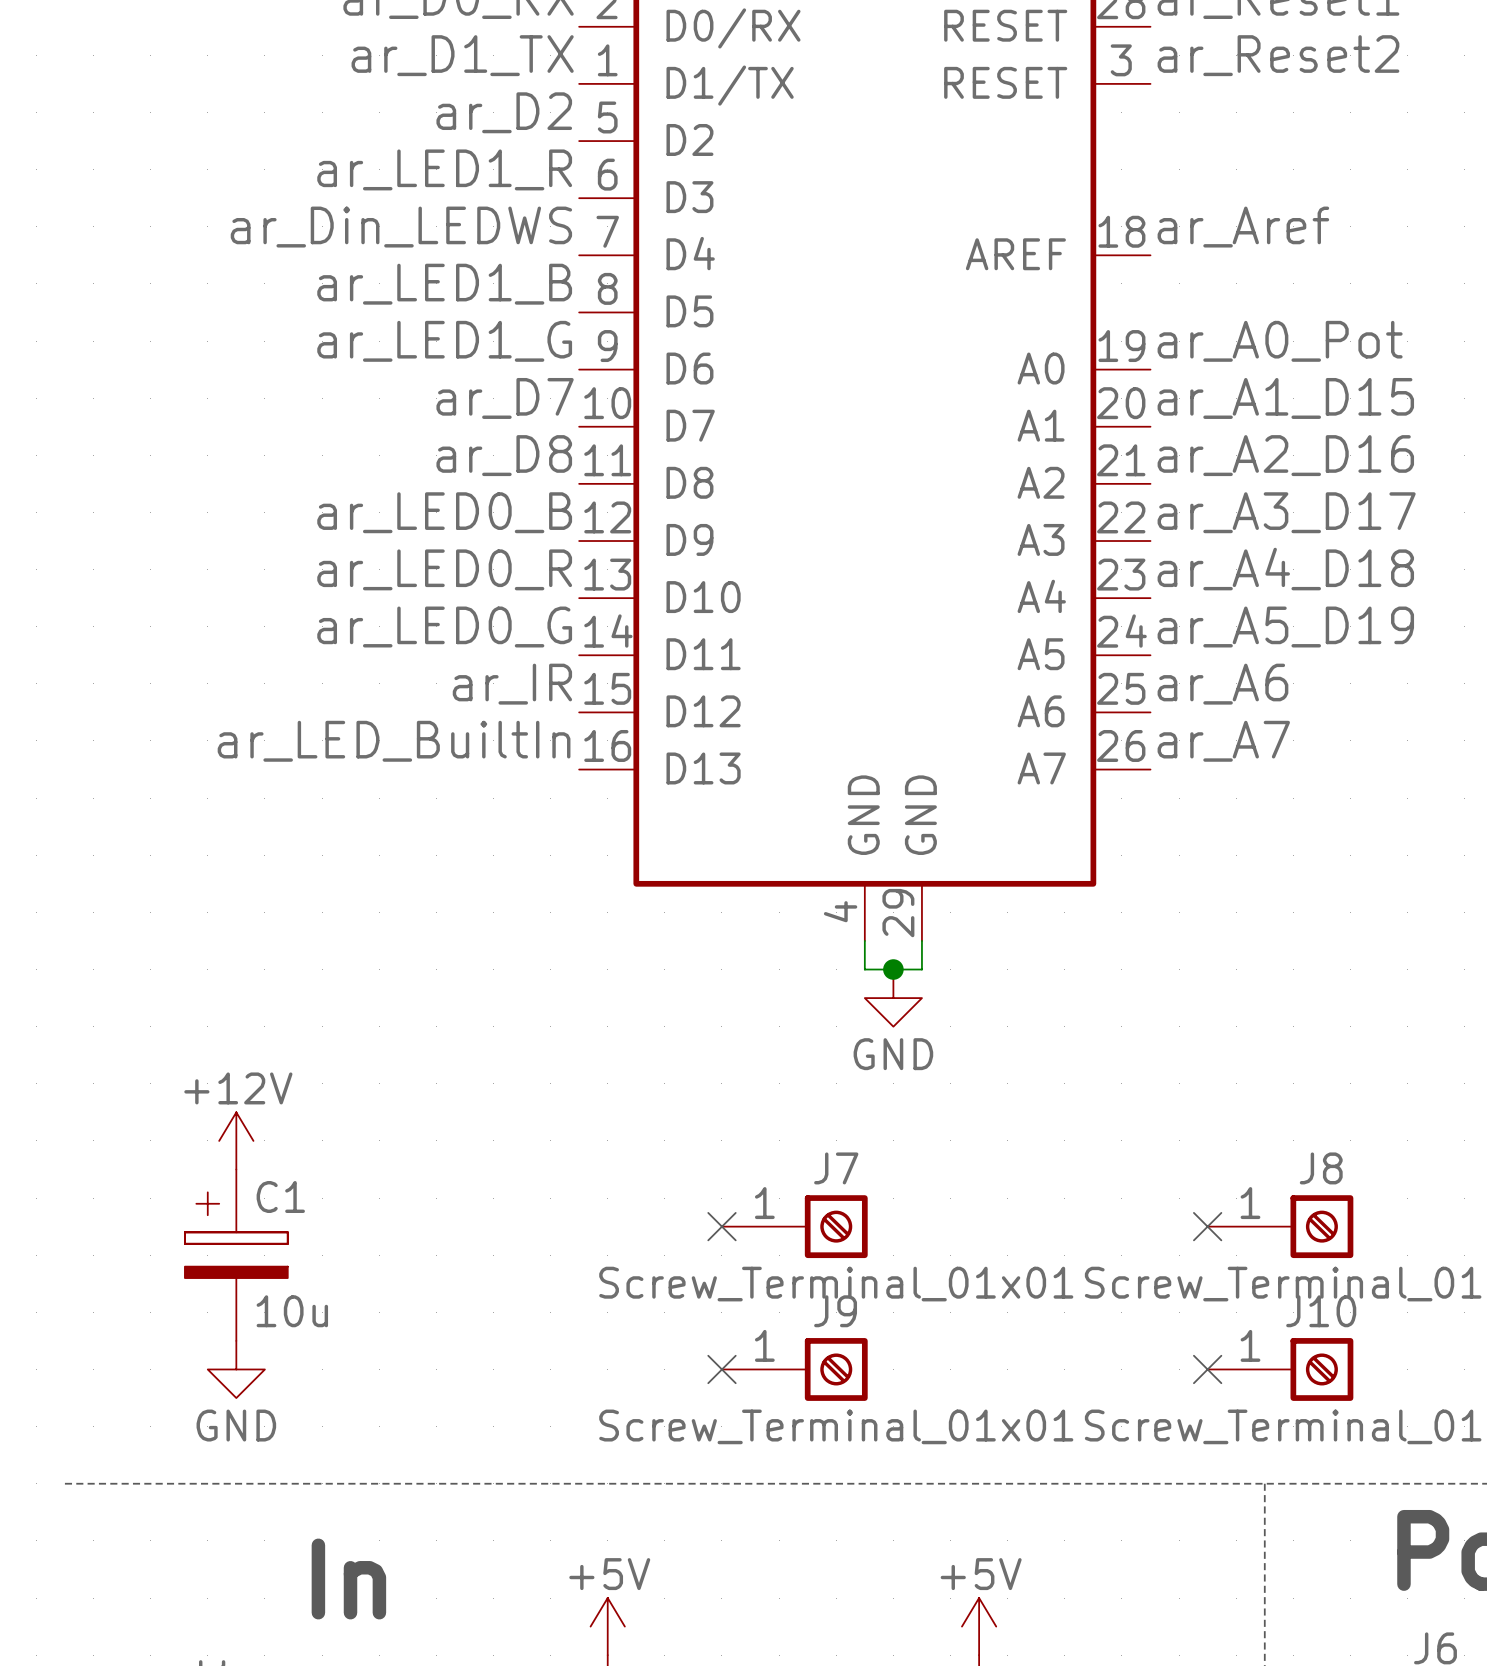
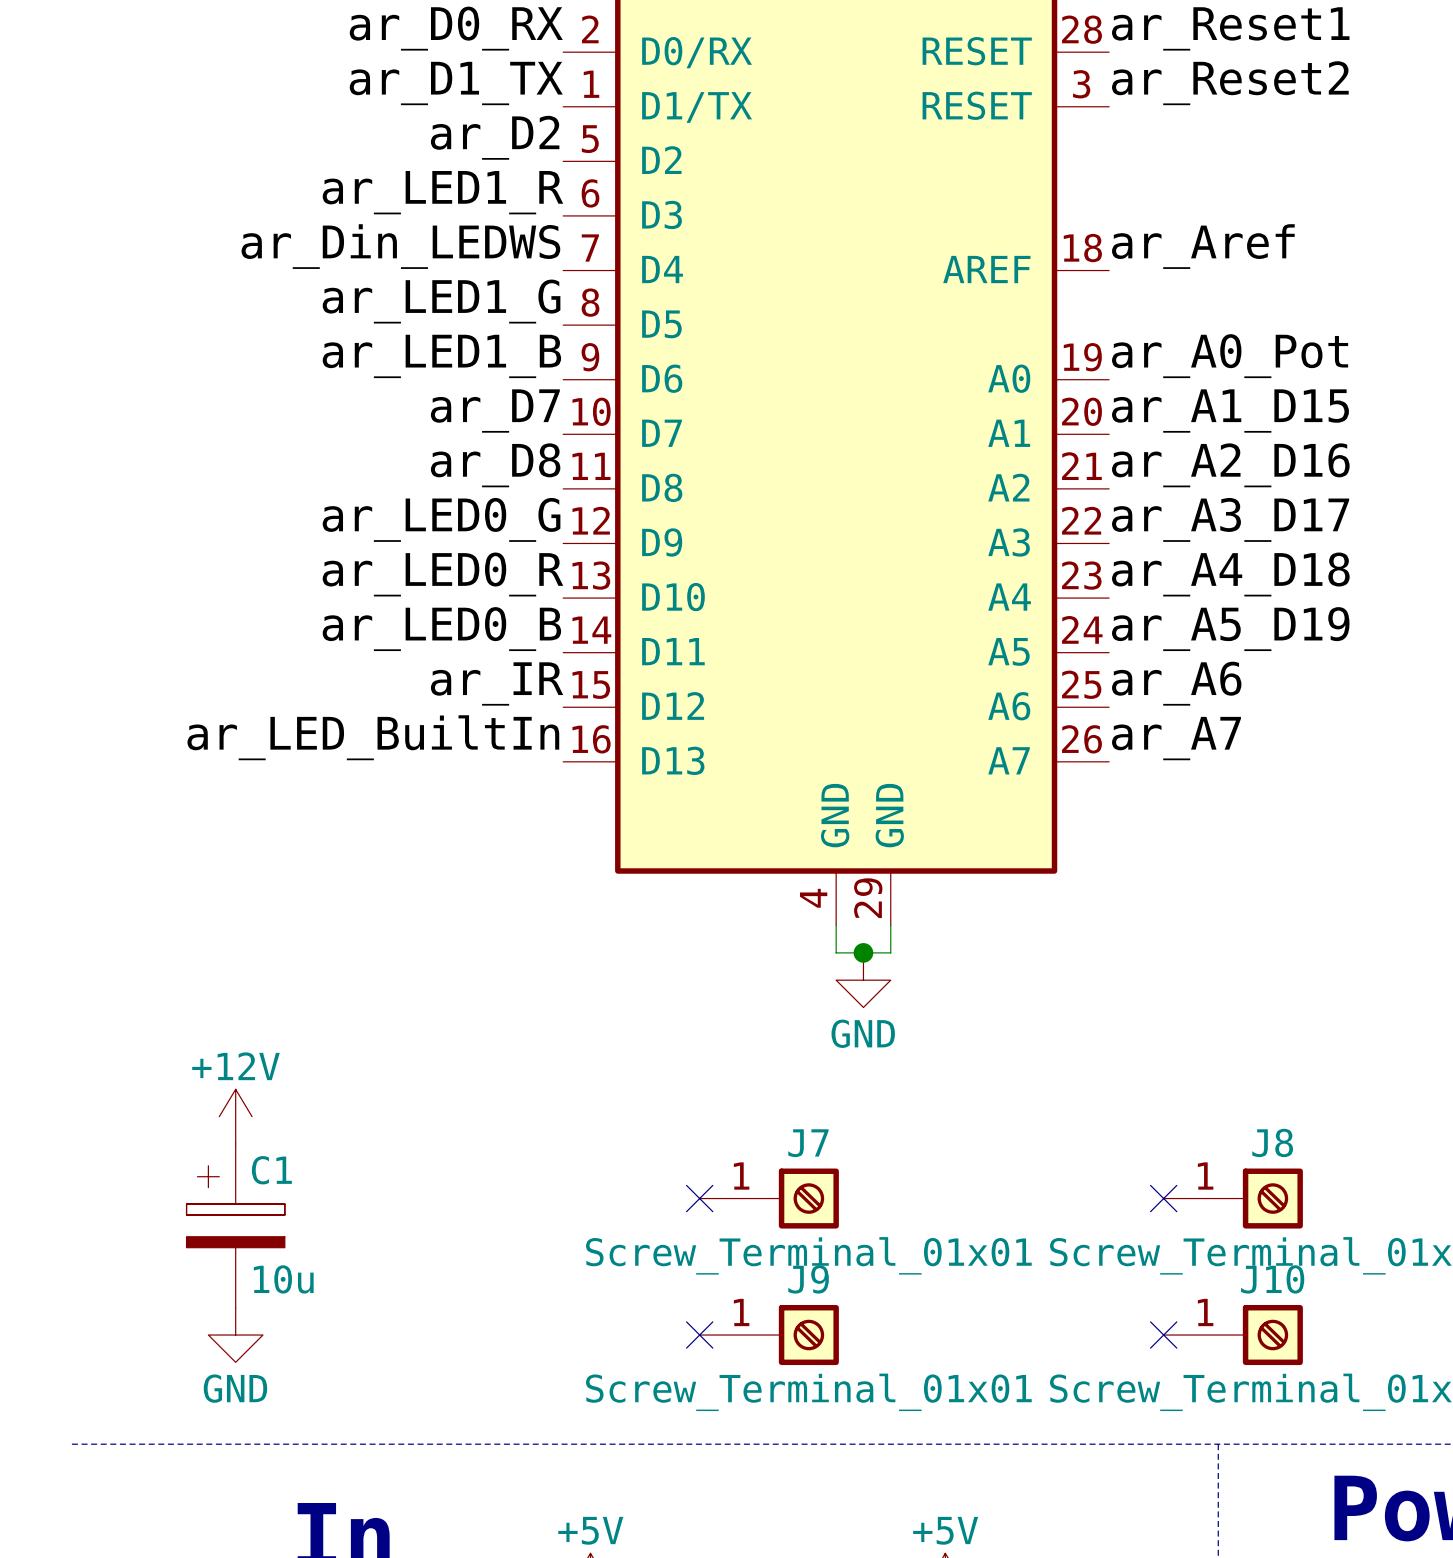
label: ar_LED1_B (444, 284) -> ar_LED1_G (441, 301)
label: ar_LED1_G (444, 341) -> ar_LED1_B (441, 356)
label: ar_LED0_B (444, 512) -> ar_LED0_G (441, 519)
label: ar_LED0_G (444, 627) -> ar_LED0_B (441, 629)

